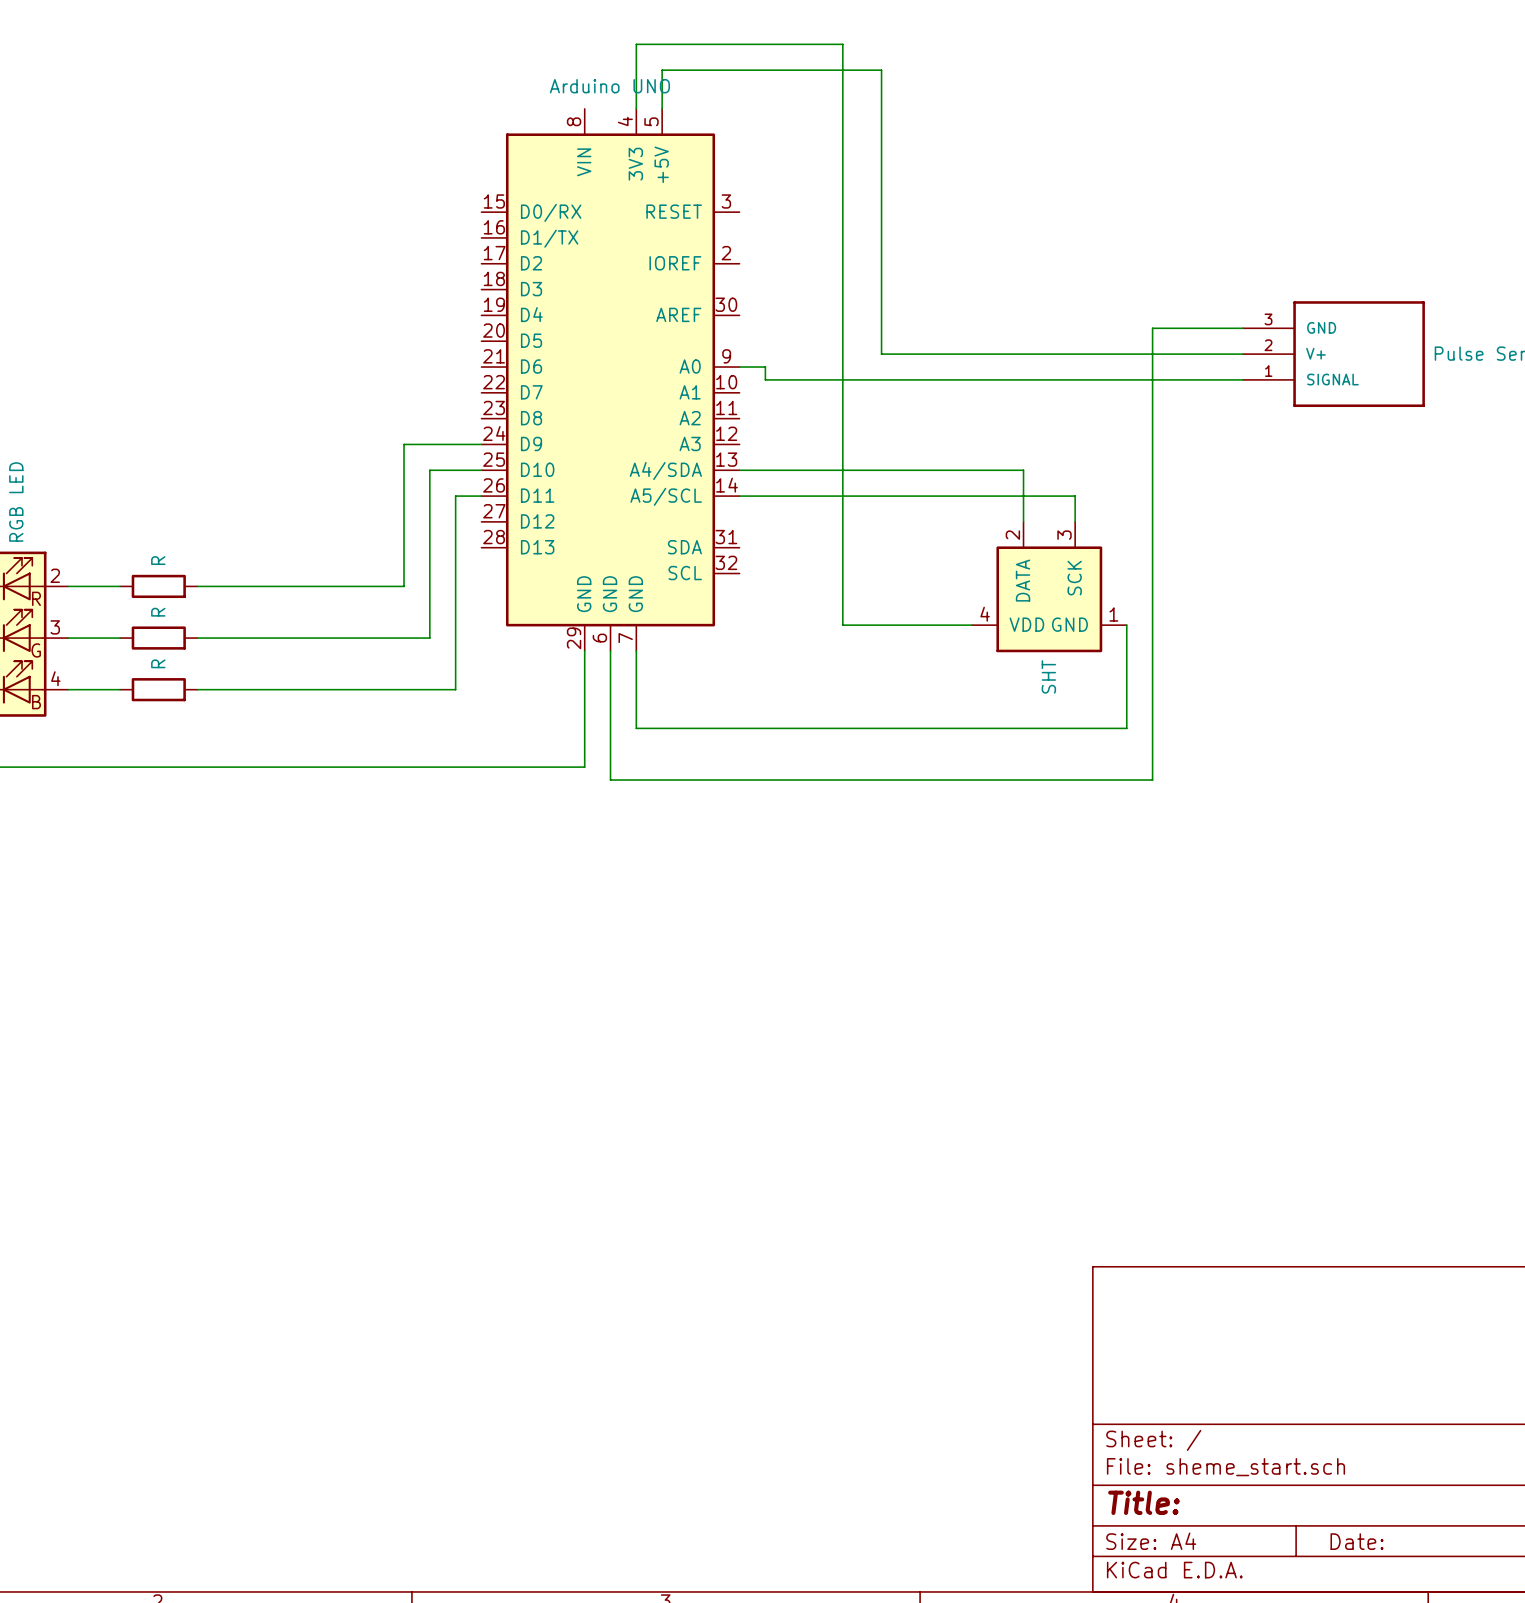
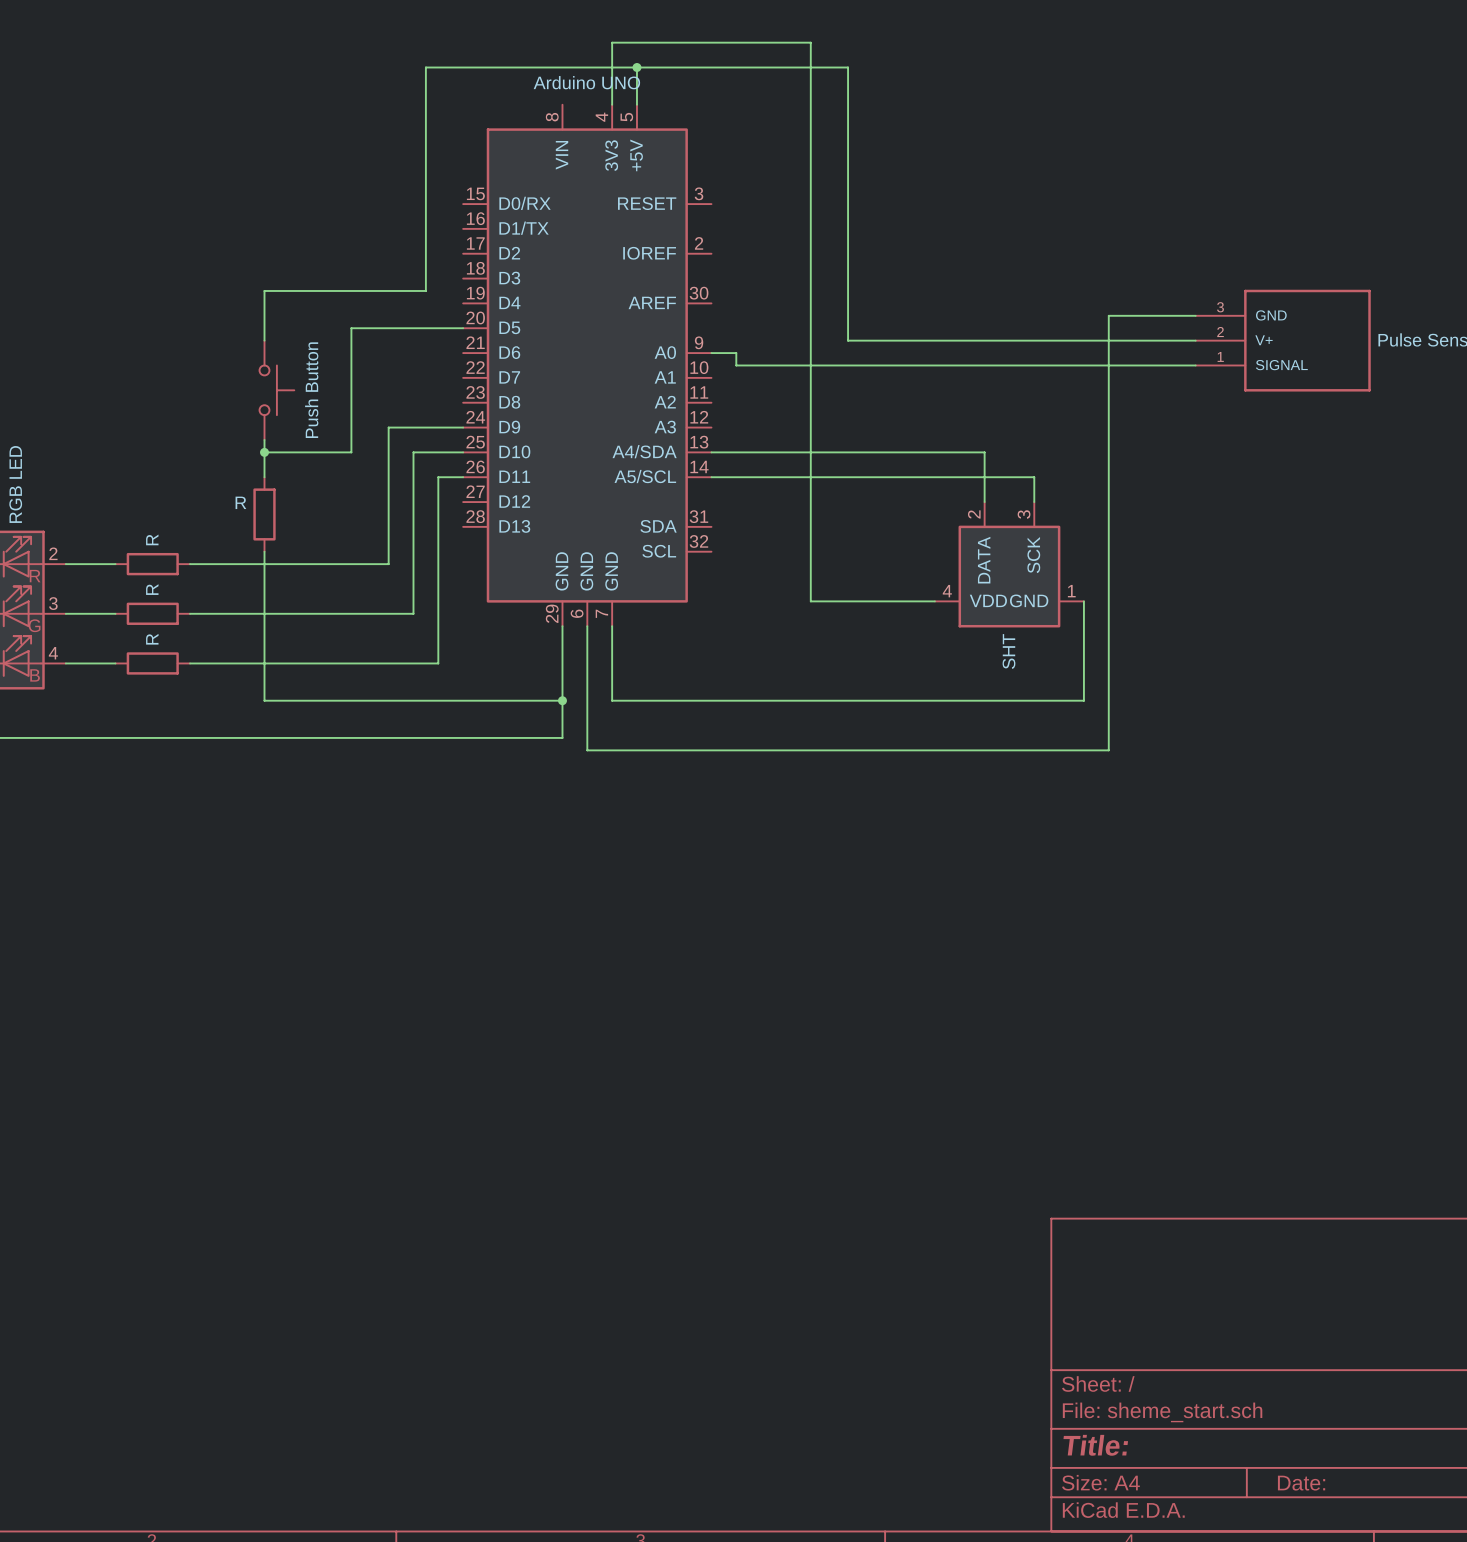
wire: none -> (636, 67) (425, 67) (425, 290) (264, 290) (264, 340)
junction: none -> (636, 67)
wire: none -> (463, 328) (351, 328) (351, 452) (264, 452)
part: none -> Push Button (276, 390)
wire: none -> (264, 439) (264, 477)
junction: none -> (264, 452)
part: none -> R (264, 514)
wire: none -> (264, 551) (264, 700) (562, 700)
junction: none -> (562, 700)

